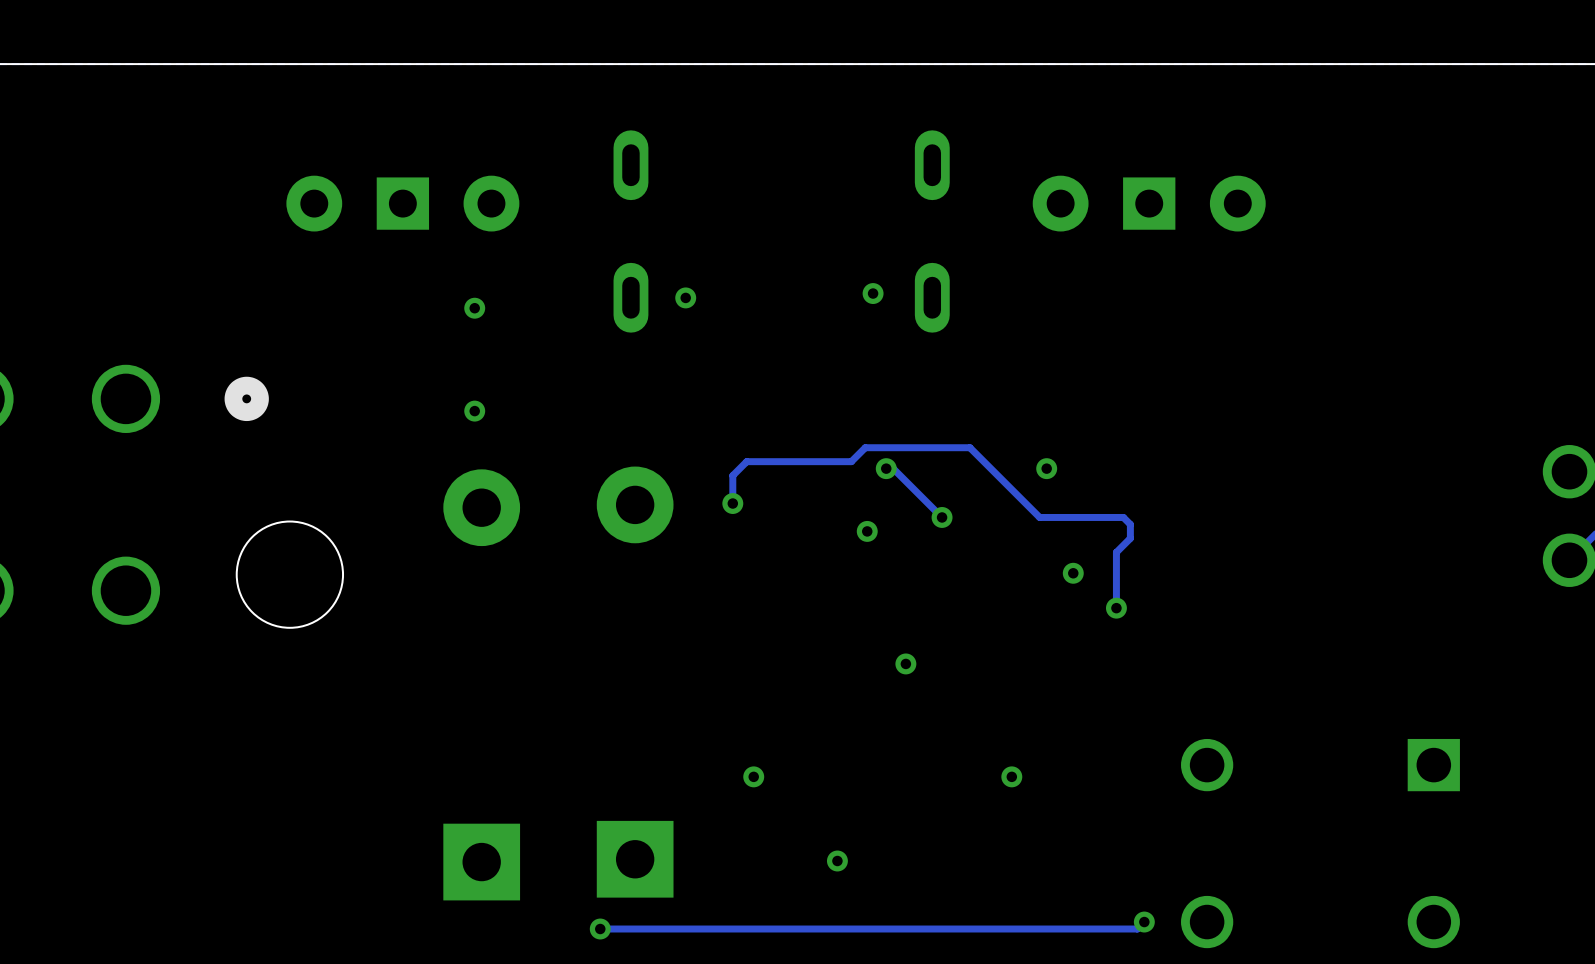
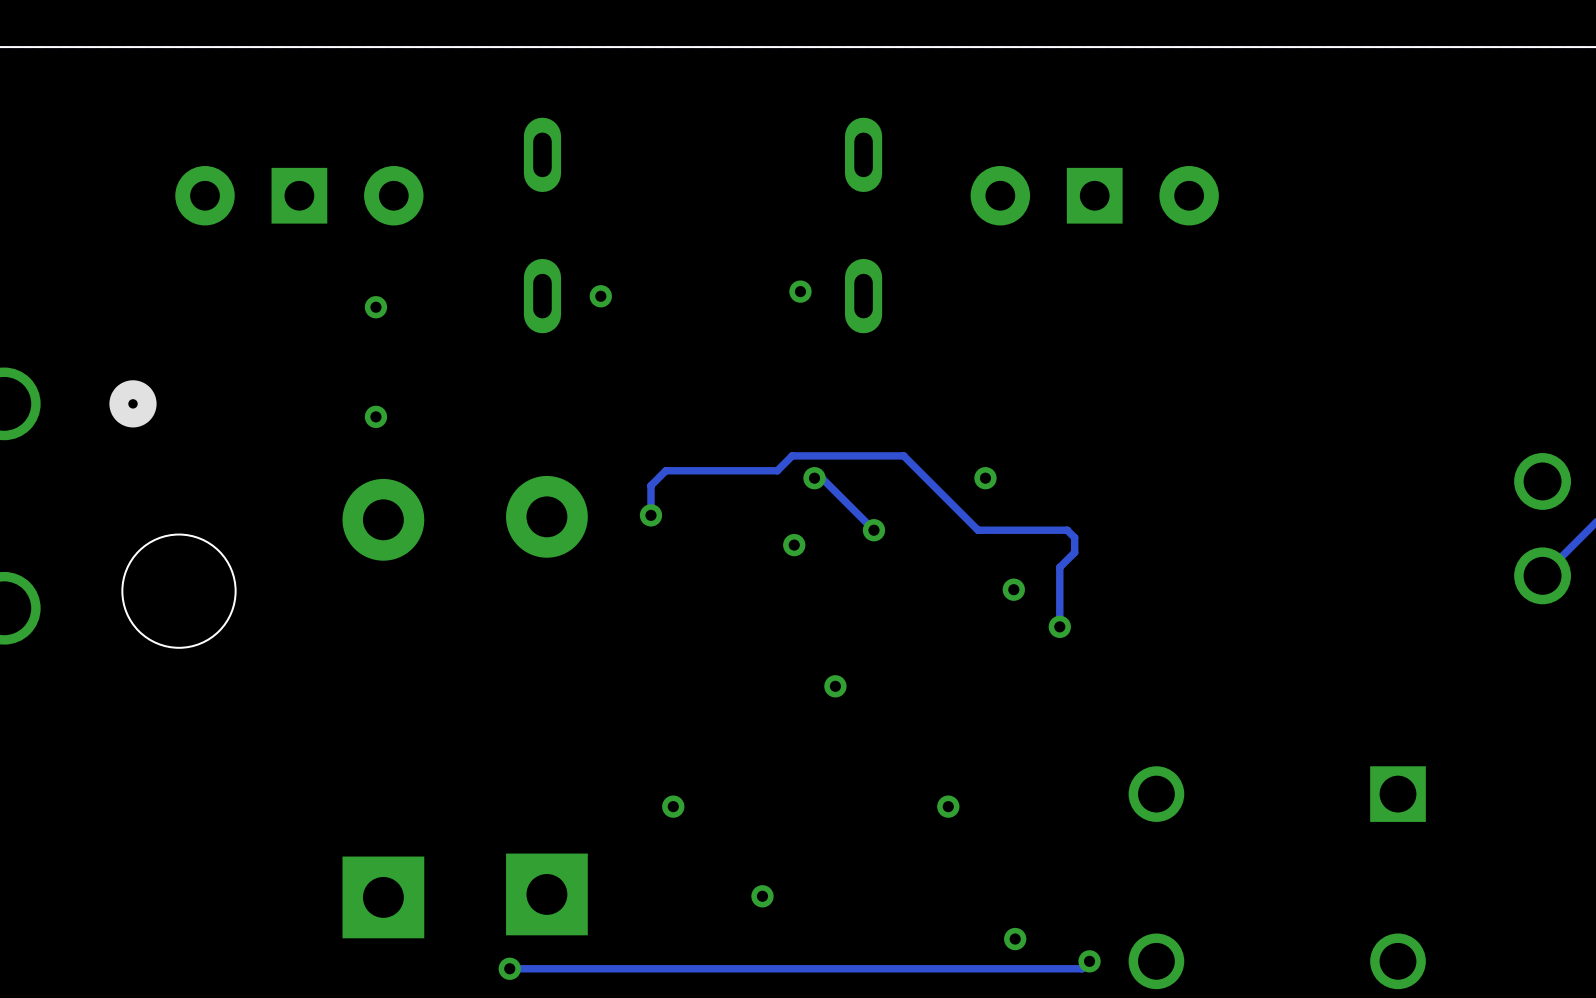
via: none -> (1015, 939)

